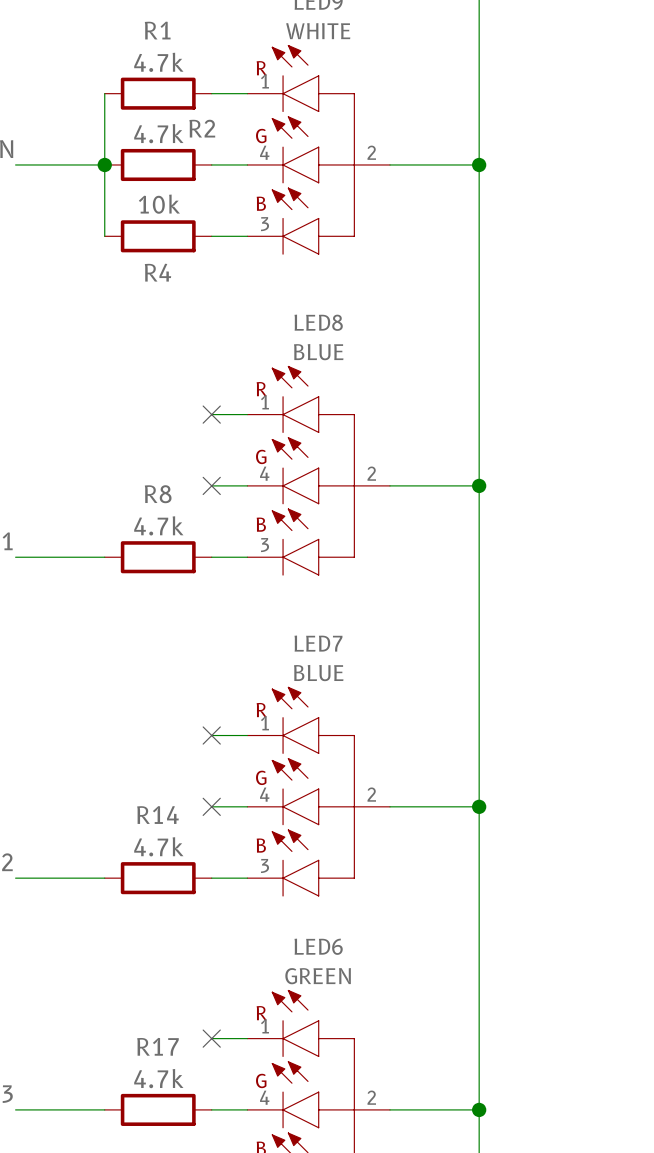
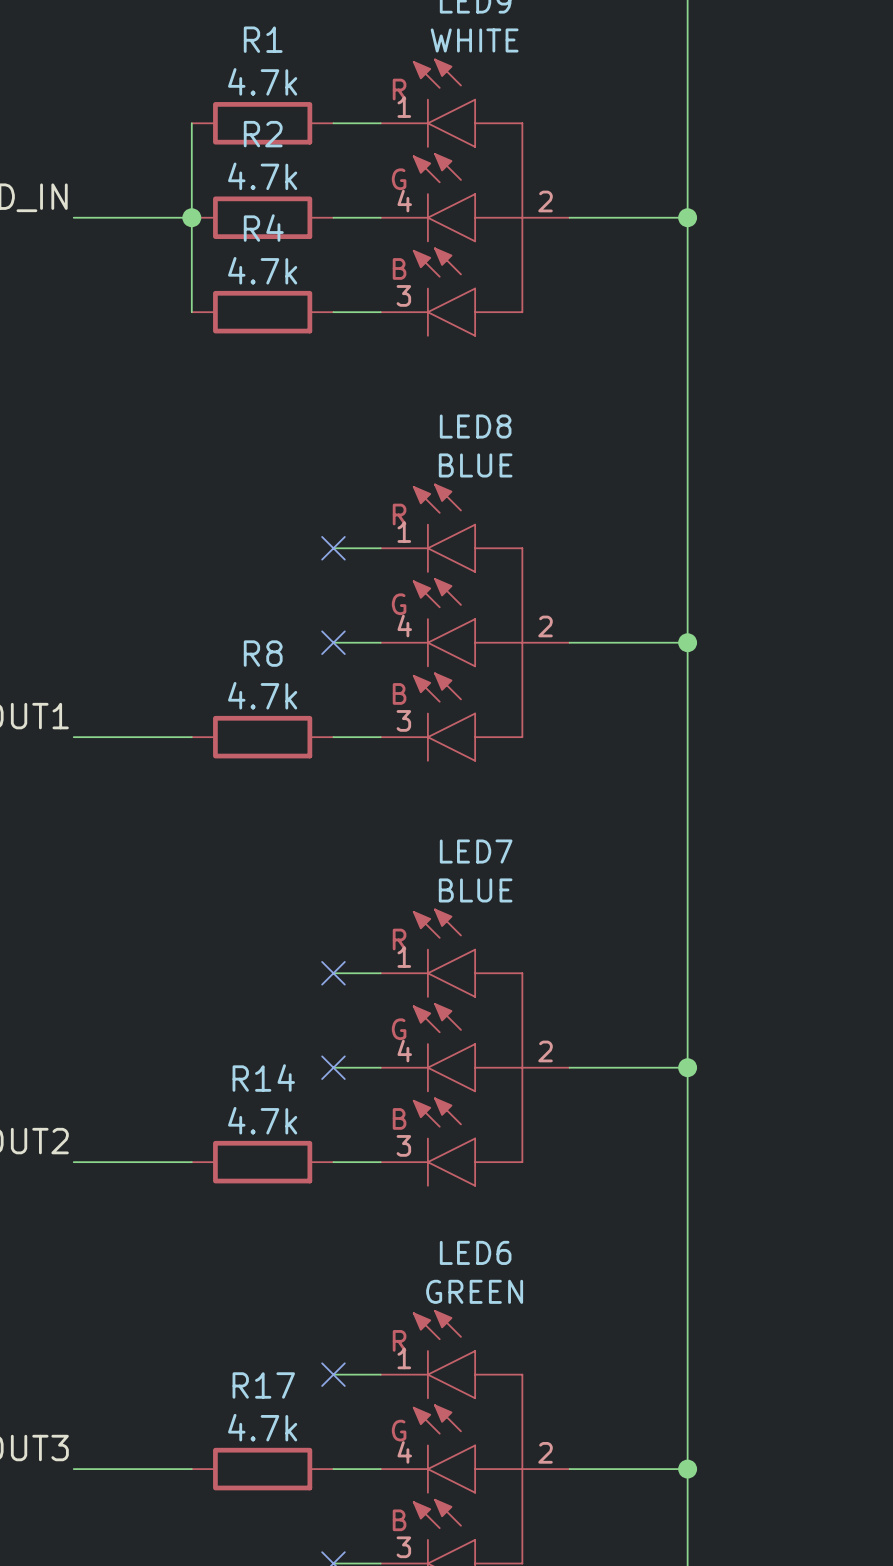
R2 name position: R2 (202, 128) -> R2 (263, 134)
R4 text: 10k (159, 204) -> 4.7k (262, 270)
R4 name position: R4 (157, 272) -> R4 (263, 228)

